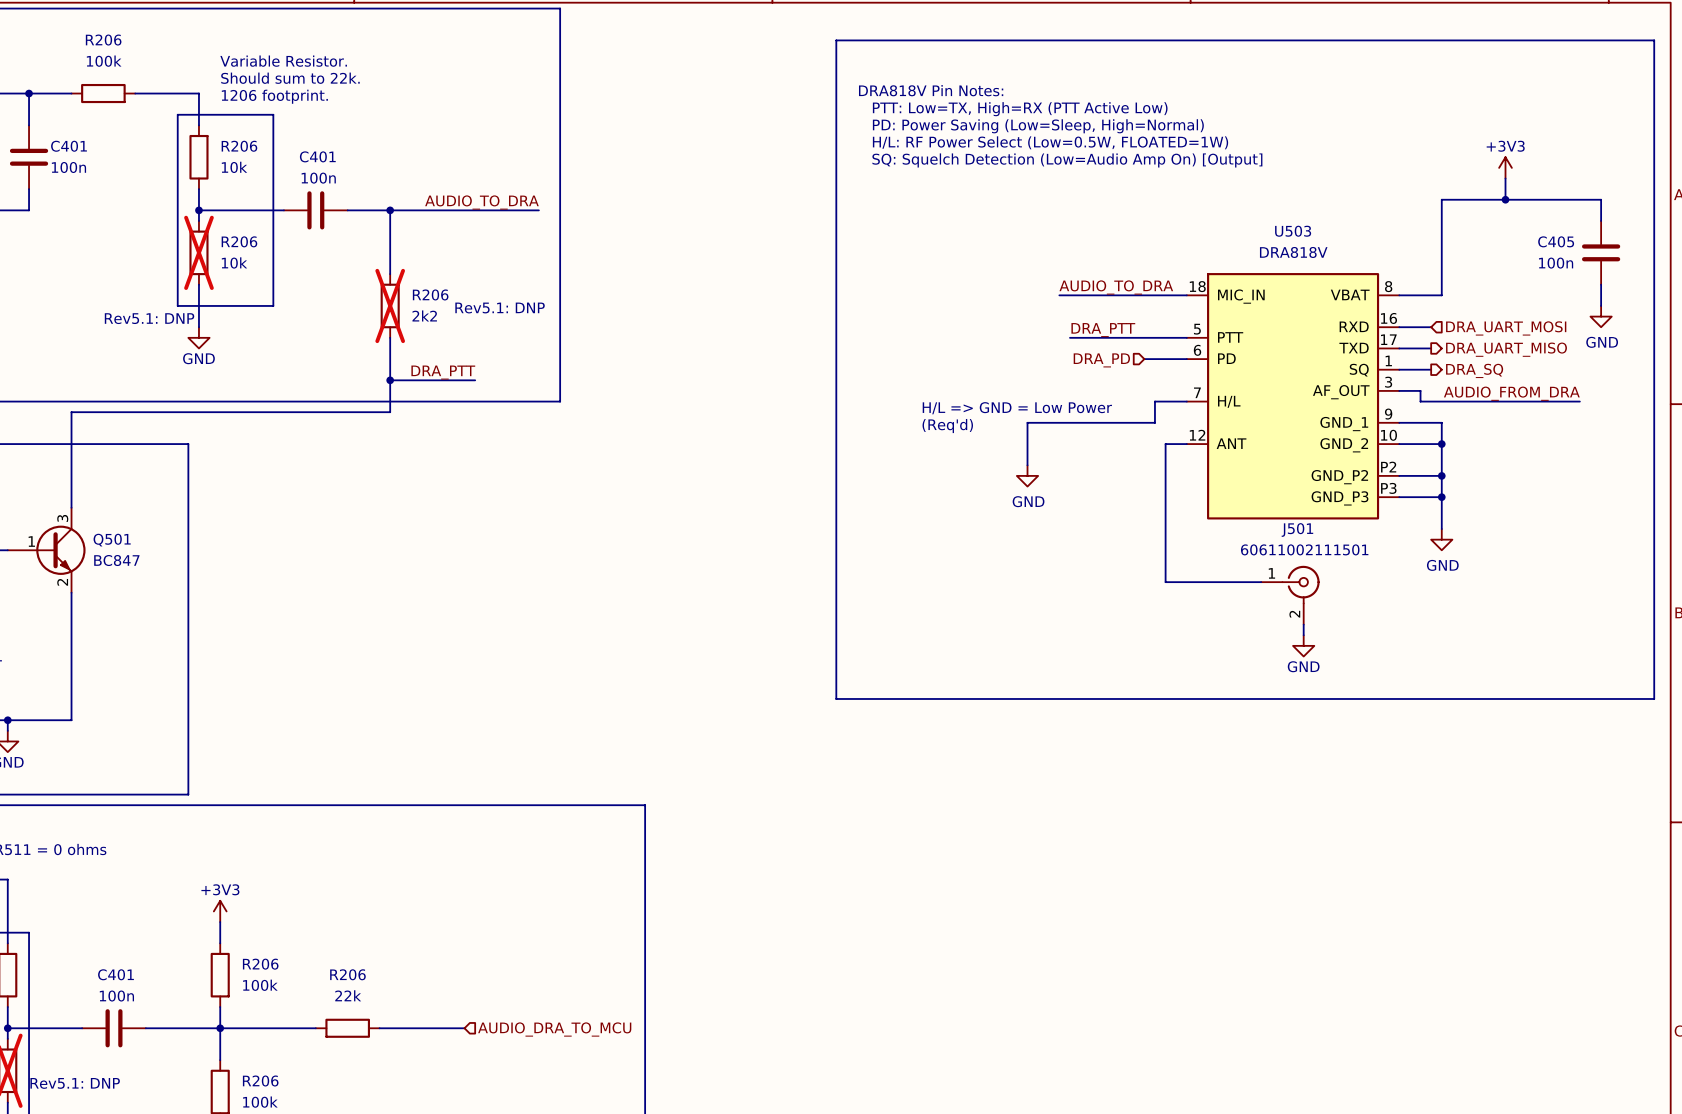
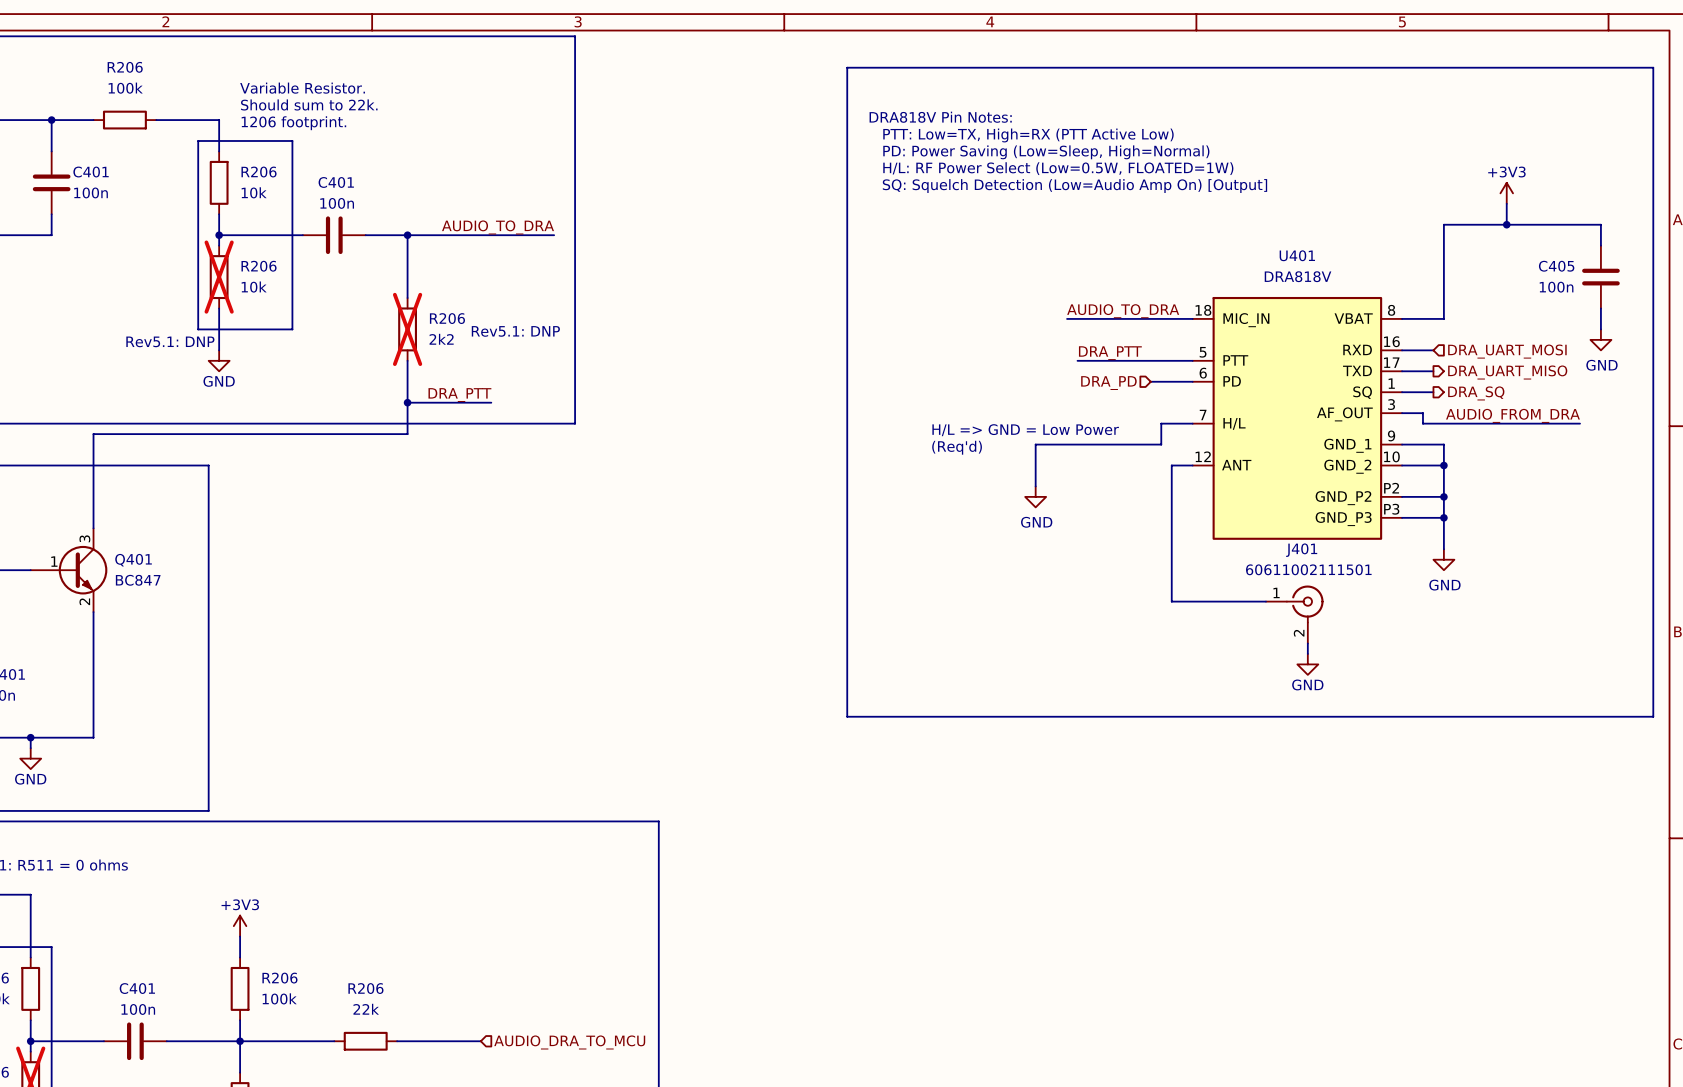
U503 name: U503 (1293, 231) -> U401 (1297, 255)
J501 name: J501 (1297, 530) -> J401 (1301, 550)
Q501 name: Q501 (112, 540) -> Q401 (133, 560)

